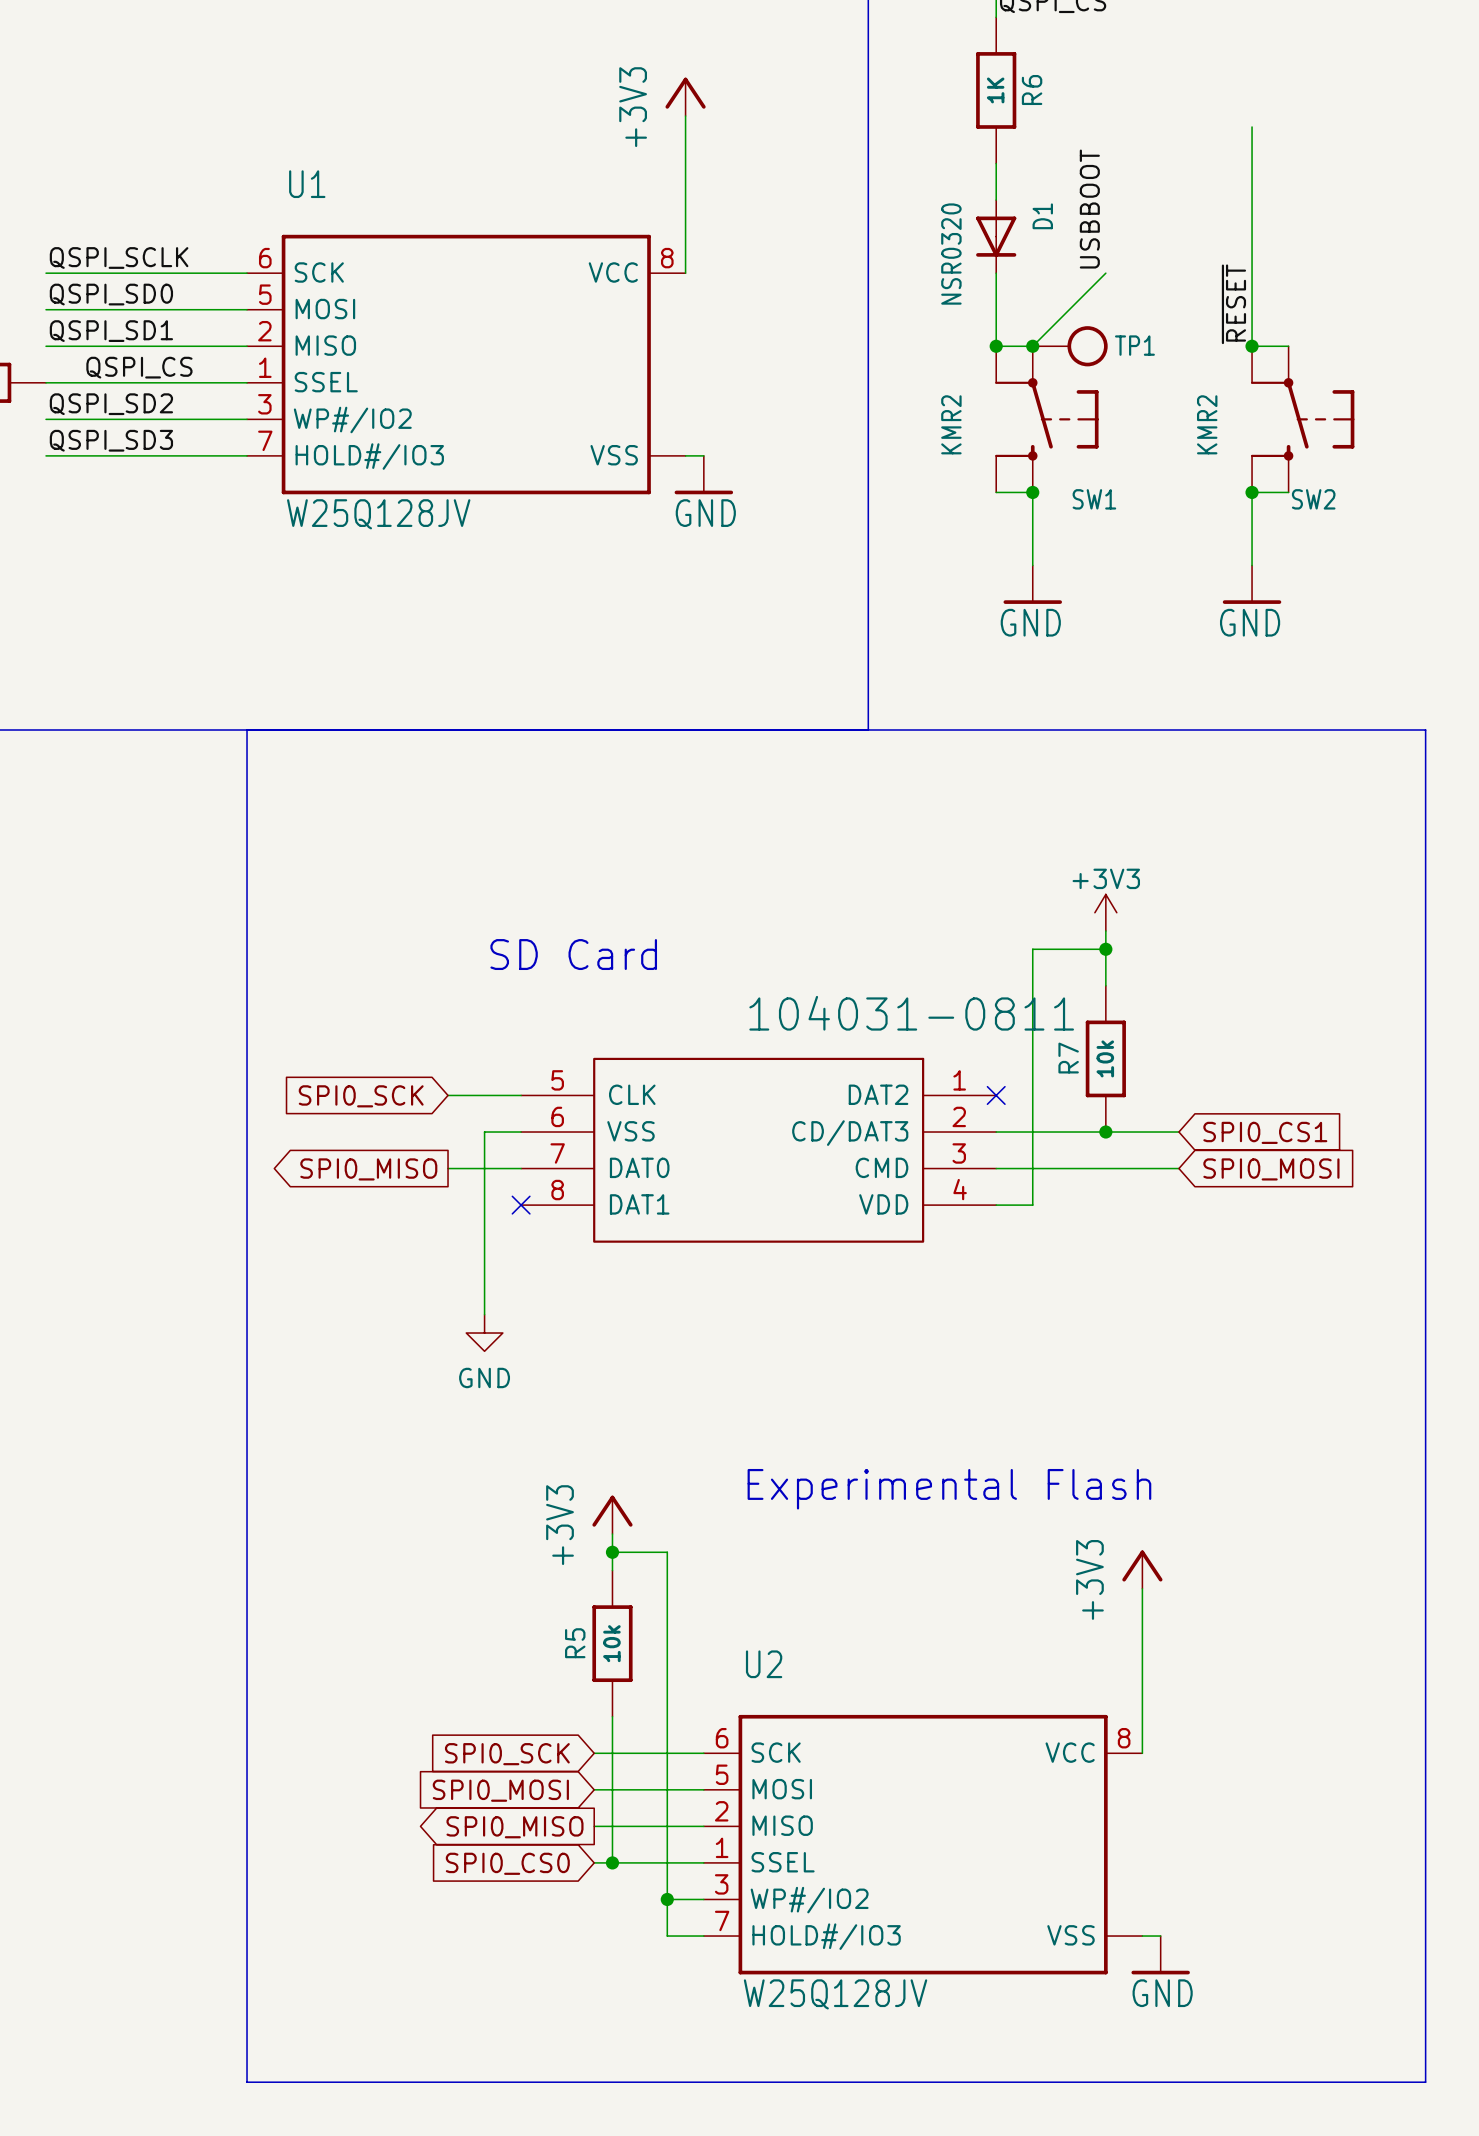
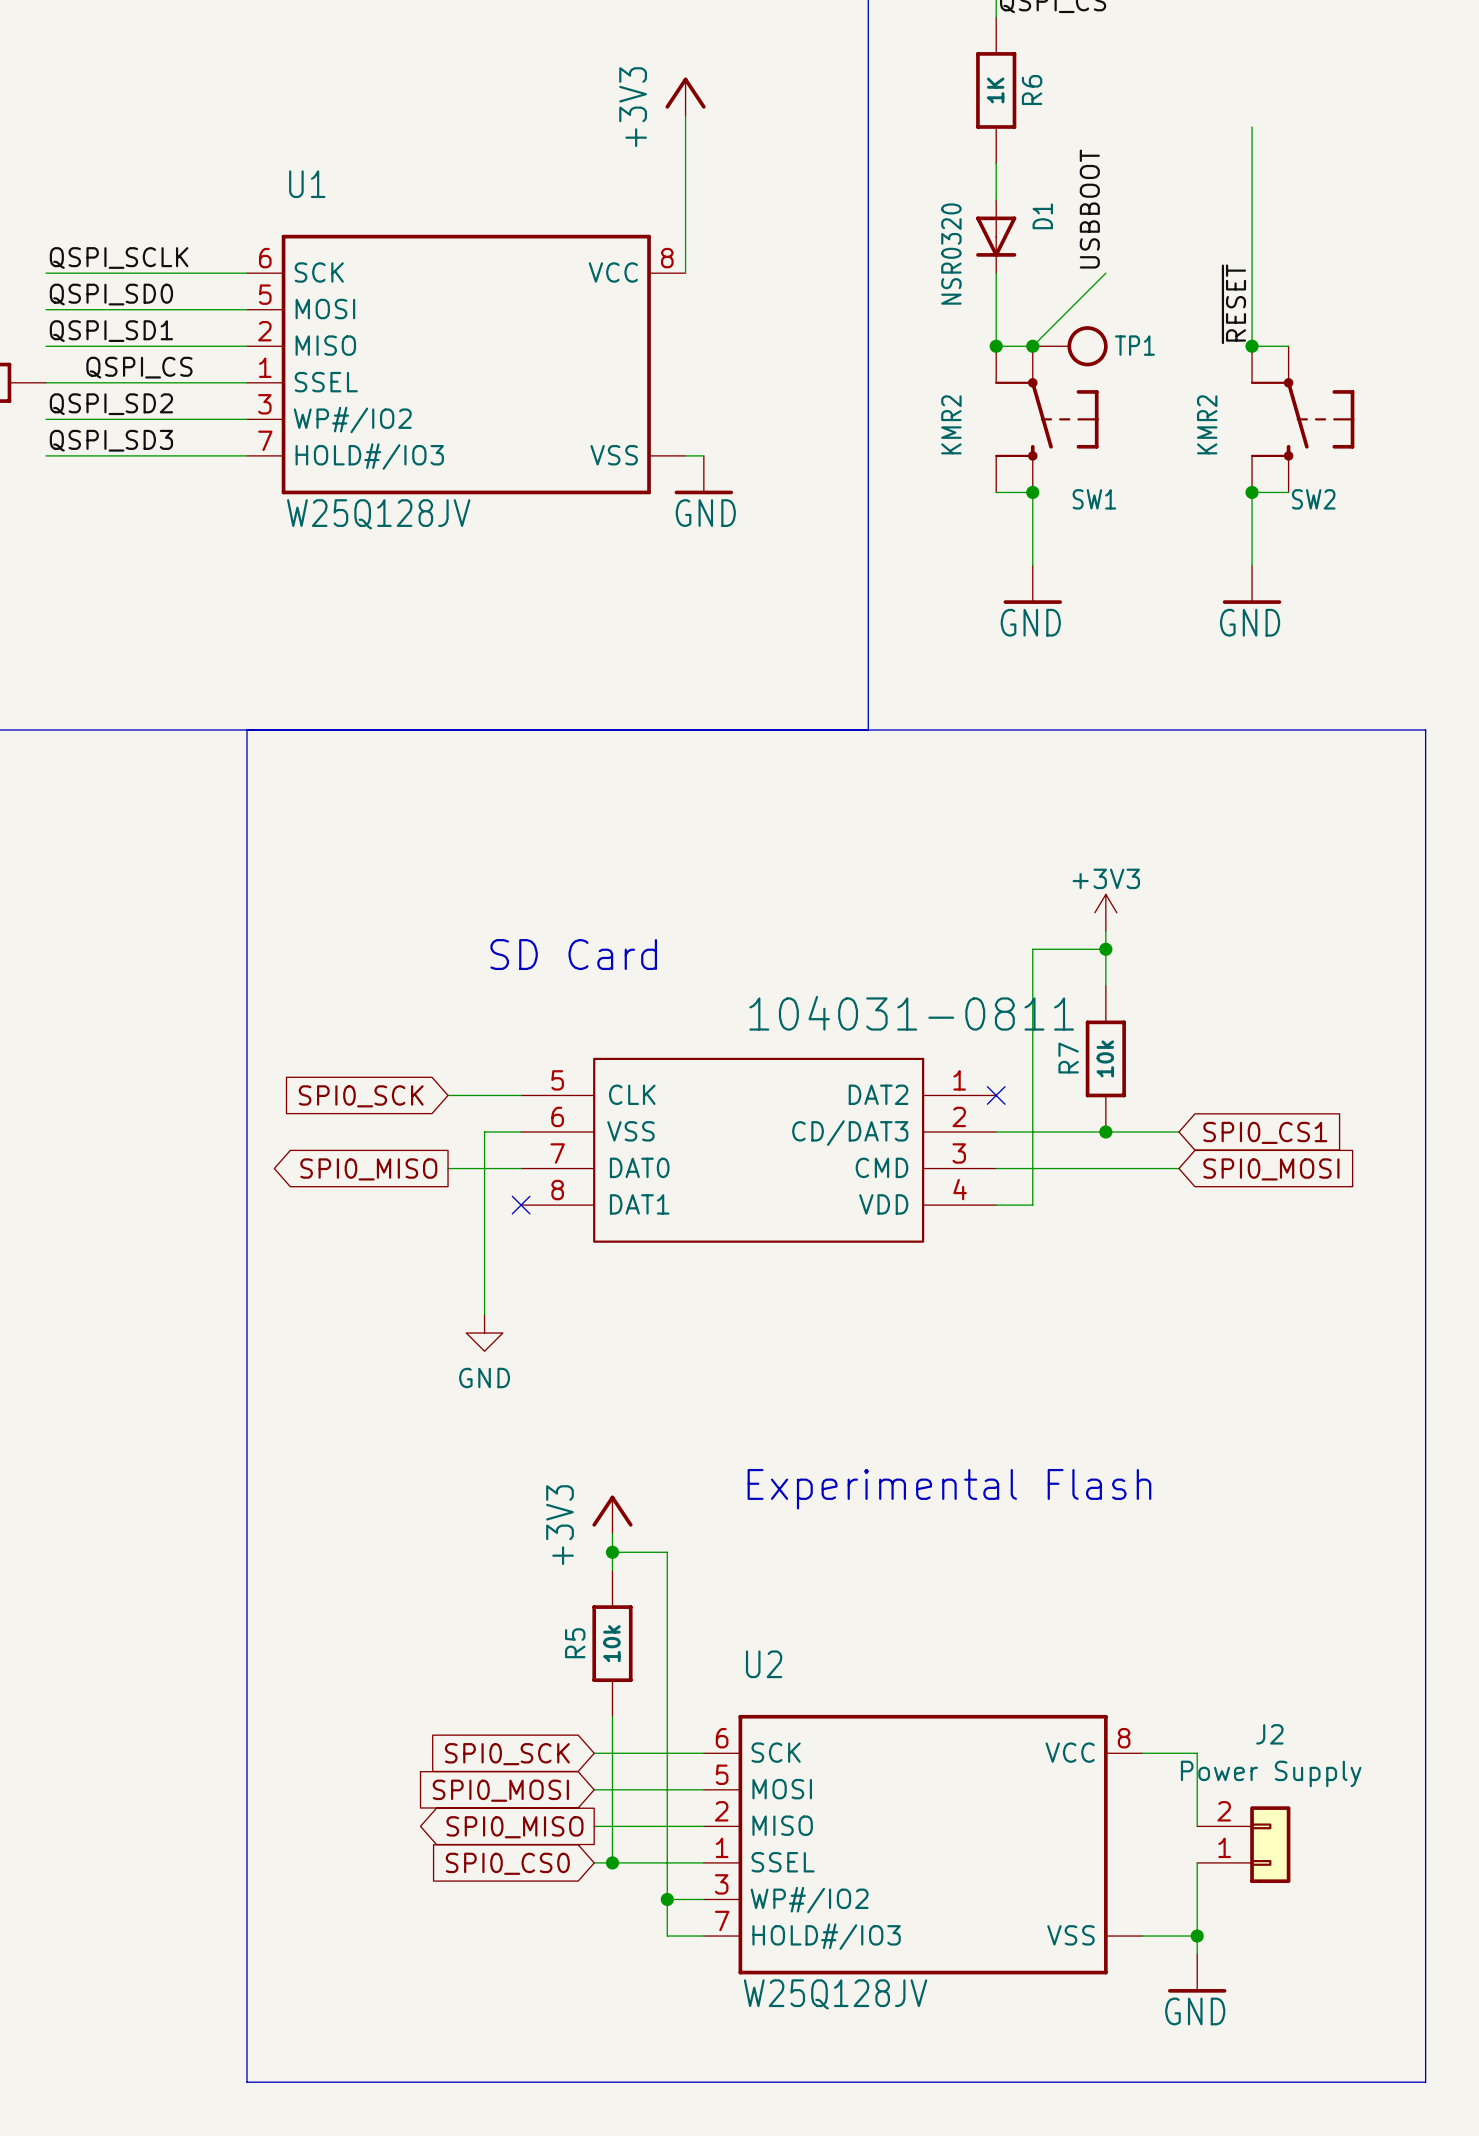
power symbol: +3V3 (1142, 1569) -> none
wire: (1142, 1588) (1142, 1753) -> (1197, 1826) (1197, 1753) (1142, 1753)
J2: none -> Power Supply (1243, 1844)
wire: none -> (1197, 1862) (1197, 1954)
wire: none -> (1160, 1936) (1197, 1936)
junction: none -> (1197, 1936)
power symbol position: GND (1160, 1955) -> GND (1197, 1973)
power symbol text position: GND (1162, 1993) -> GND (1195, 2011)

